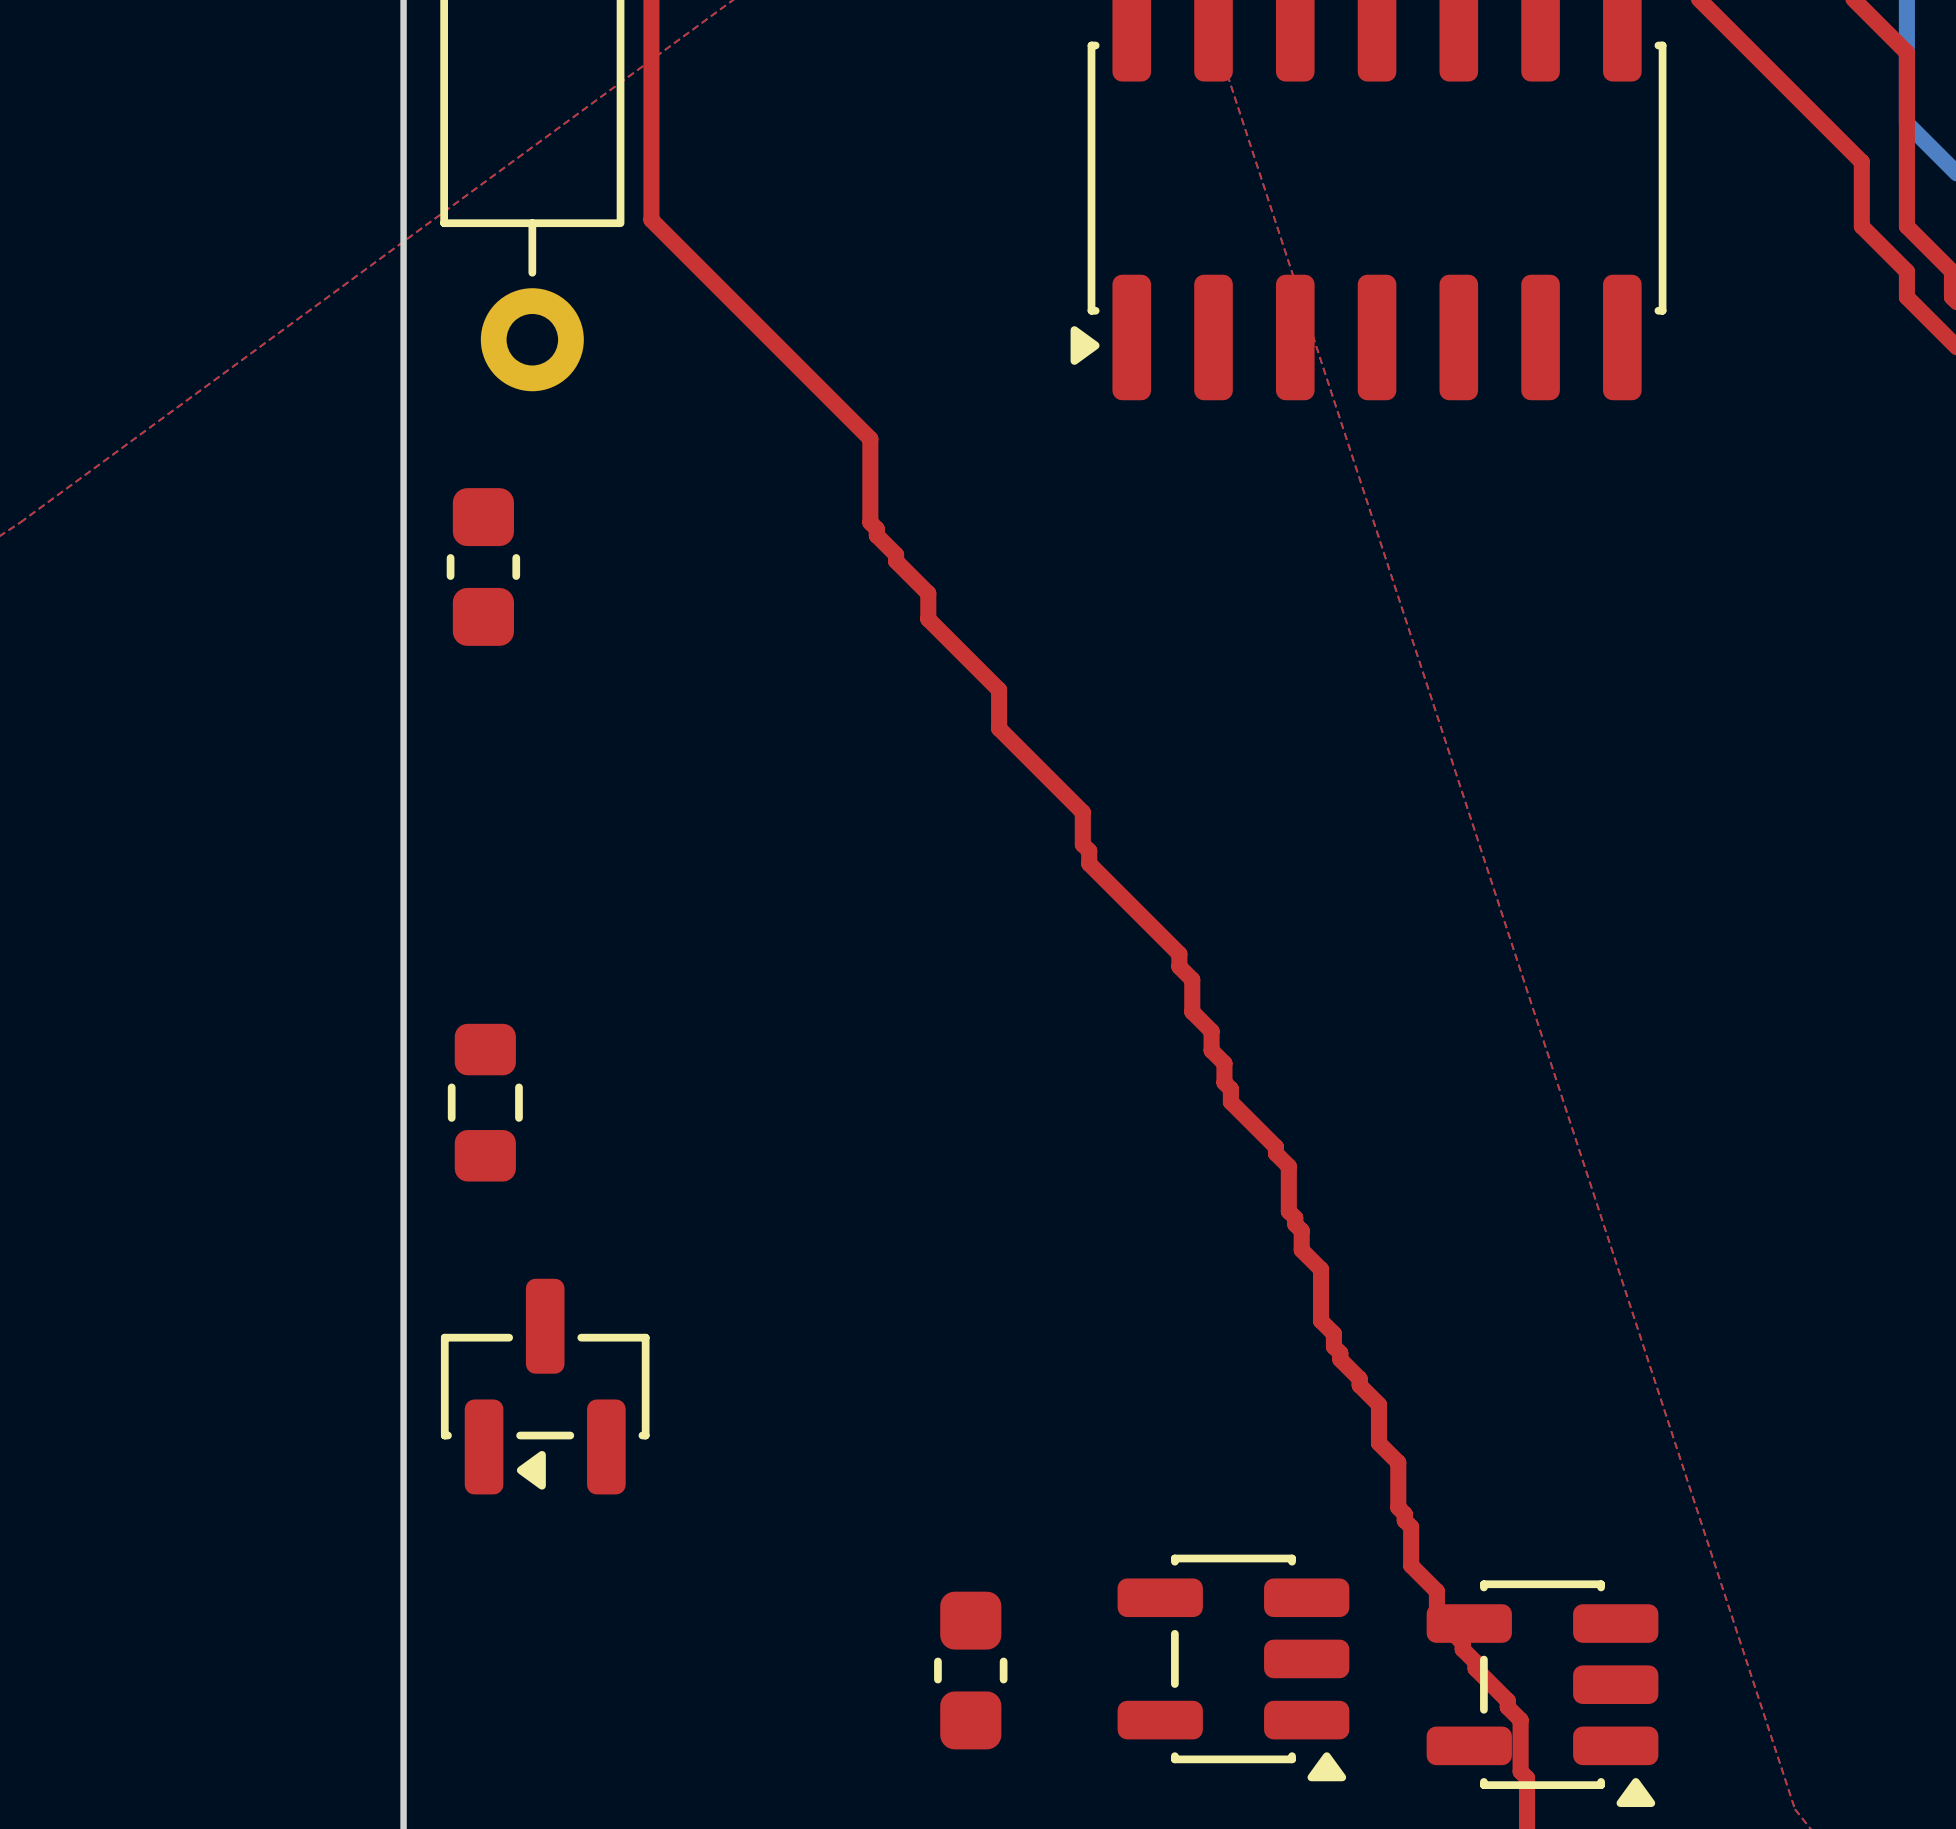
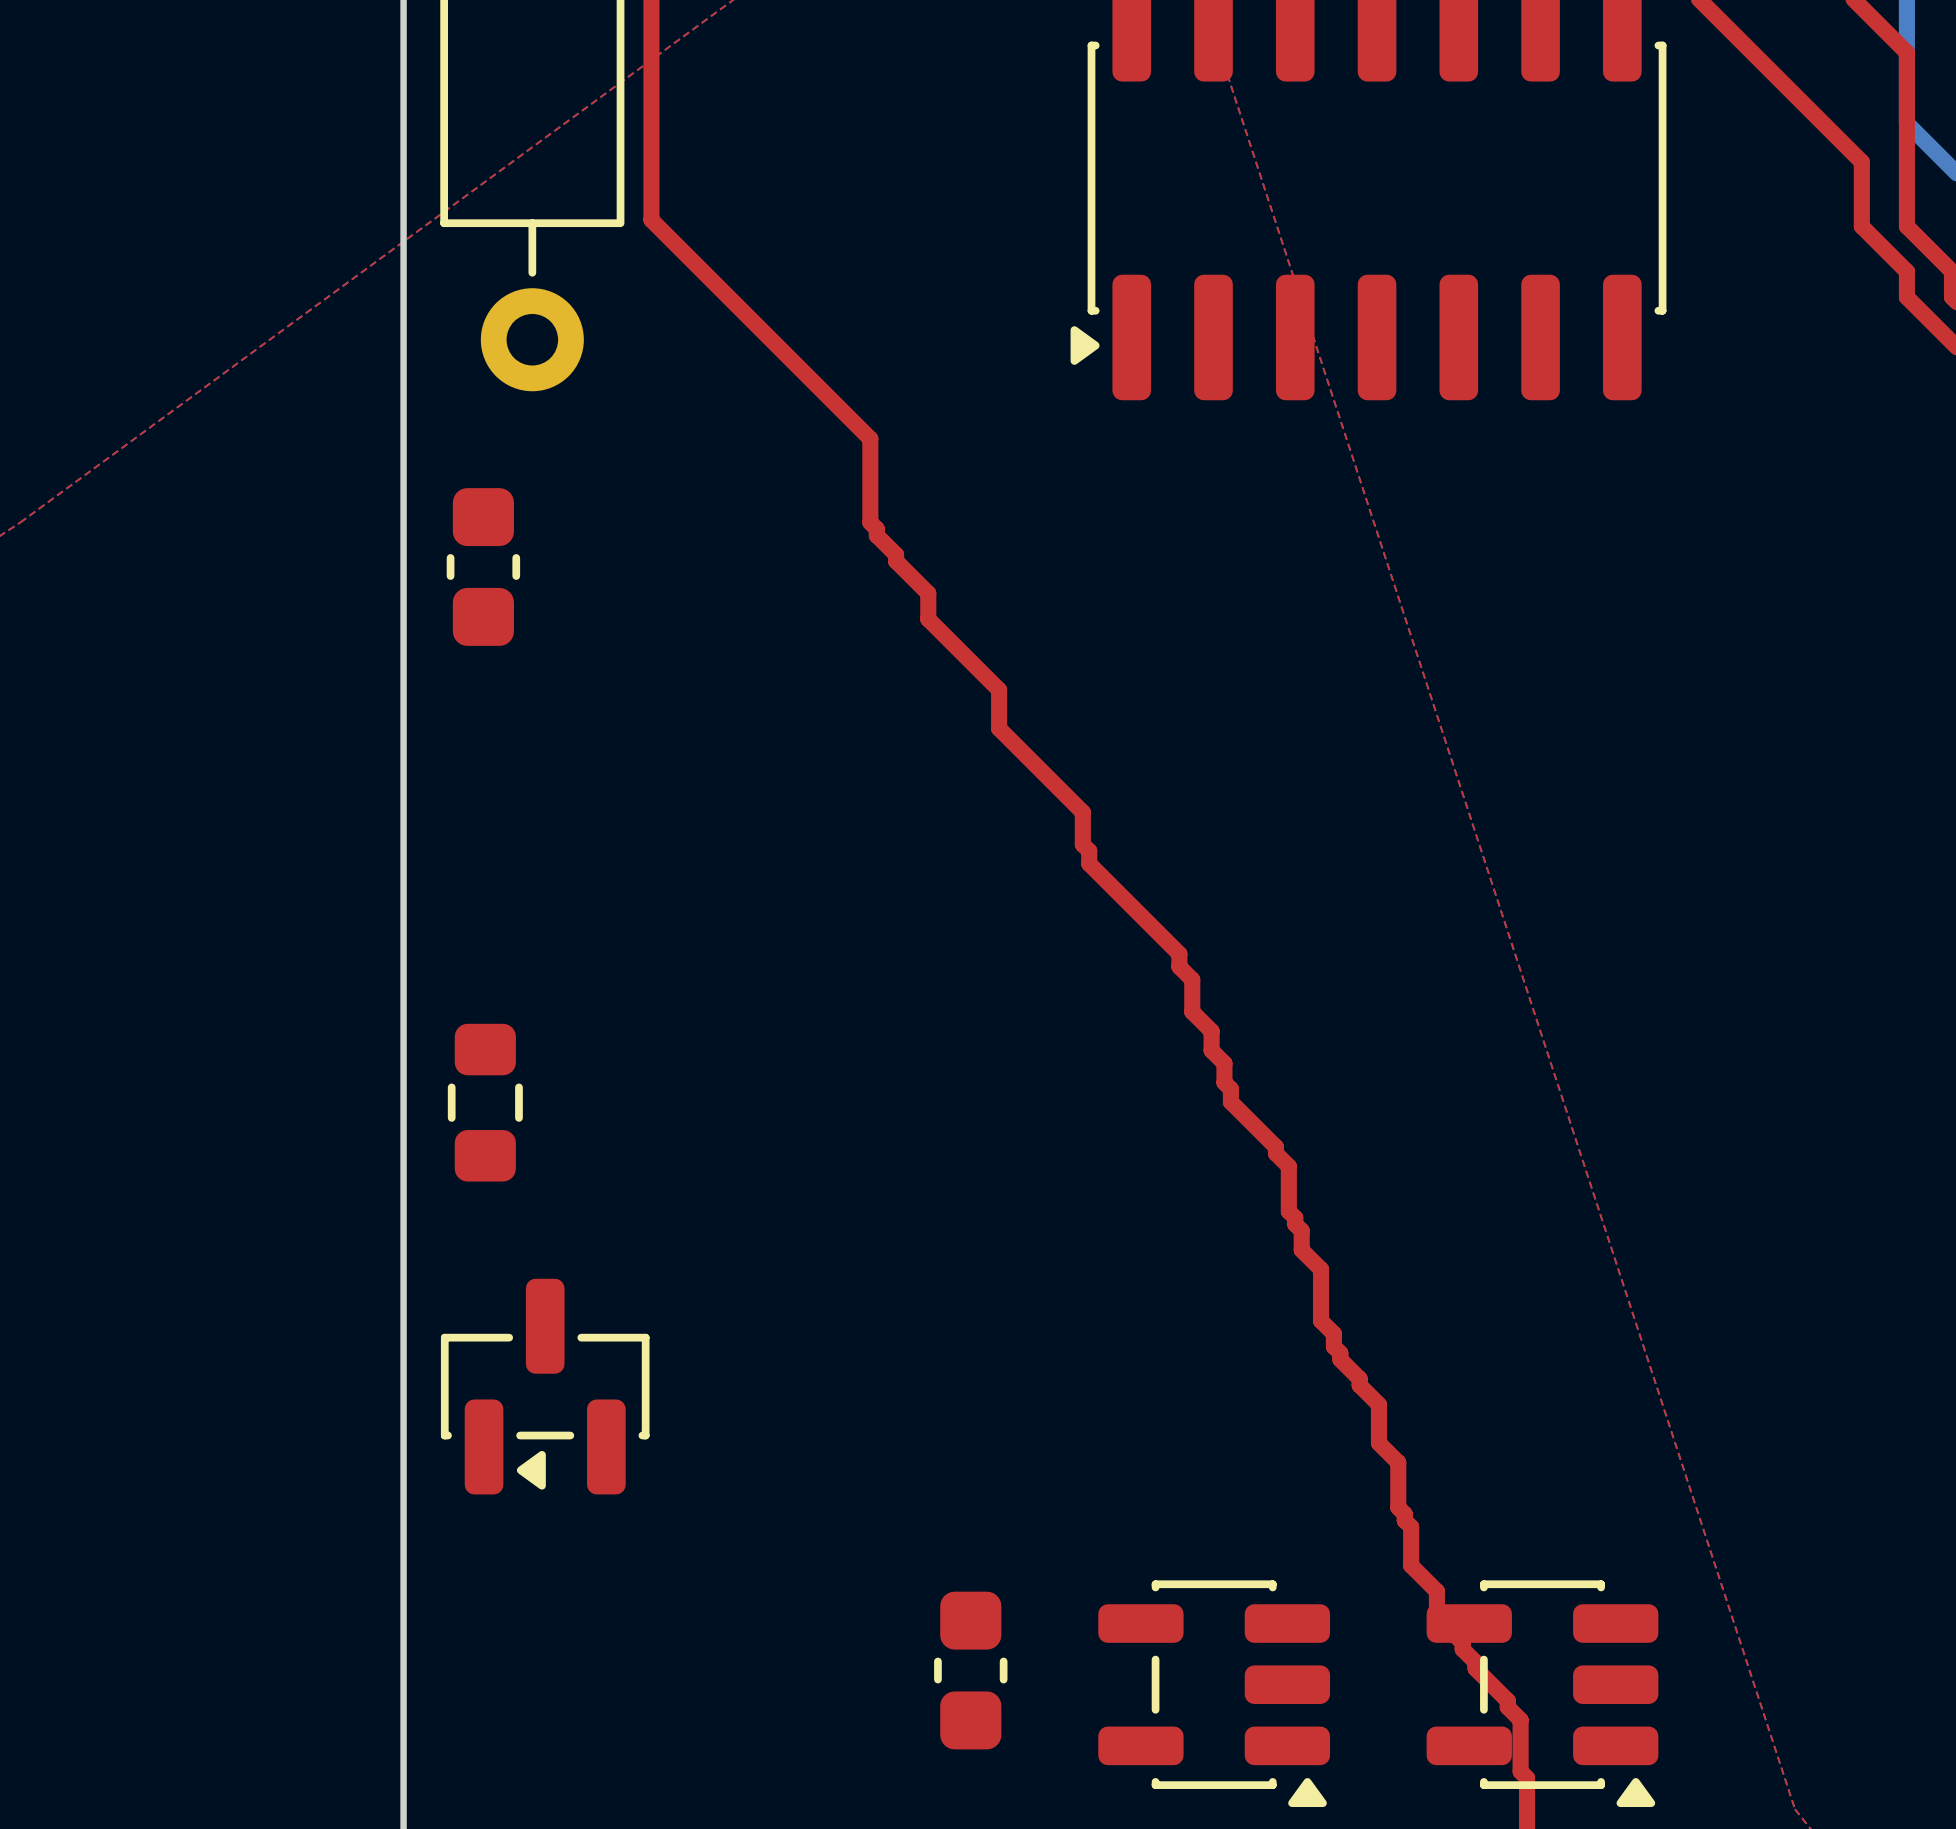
part position: (1233, 1667) -> (1214, 1693)

